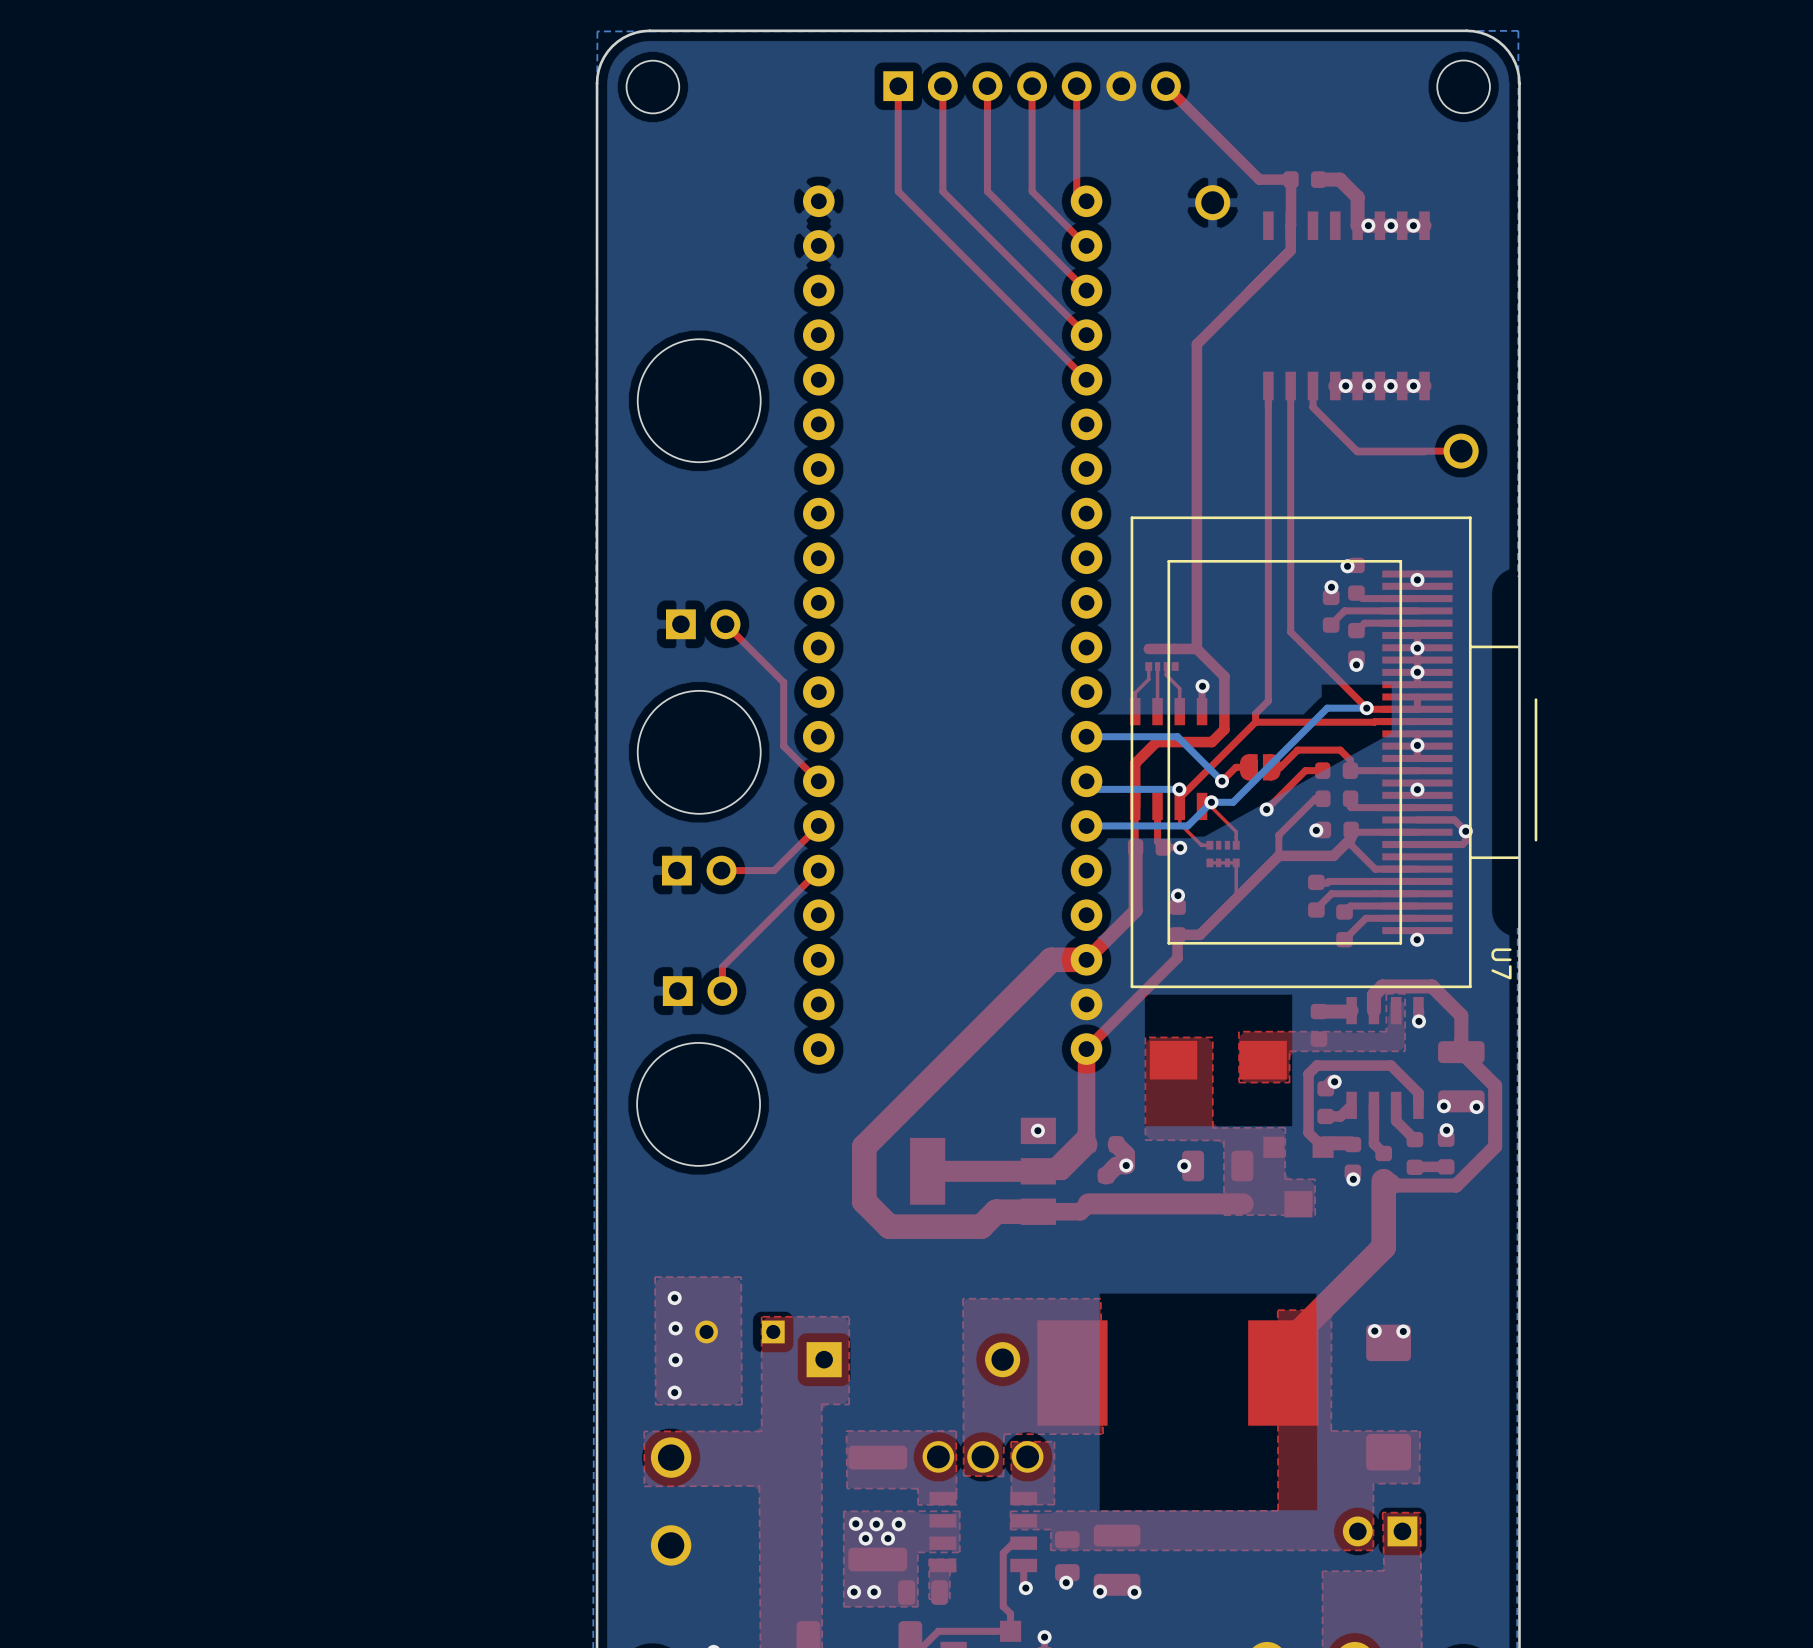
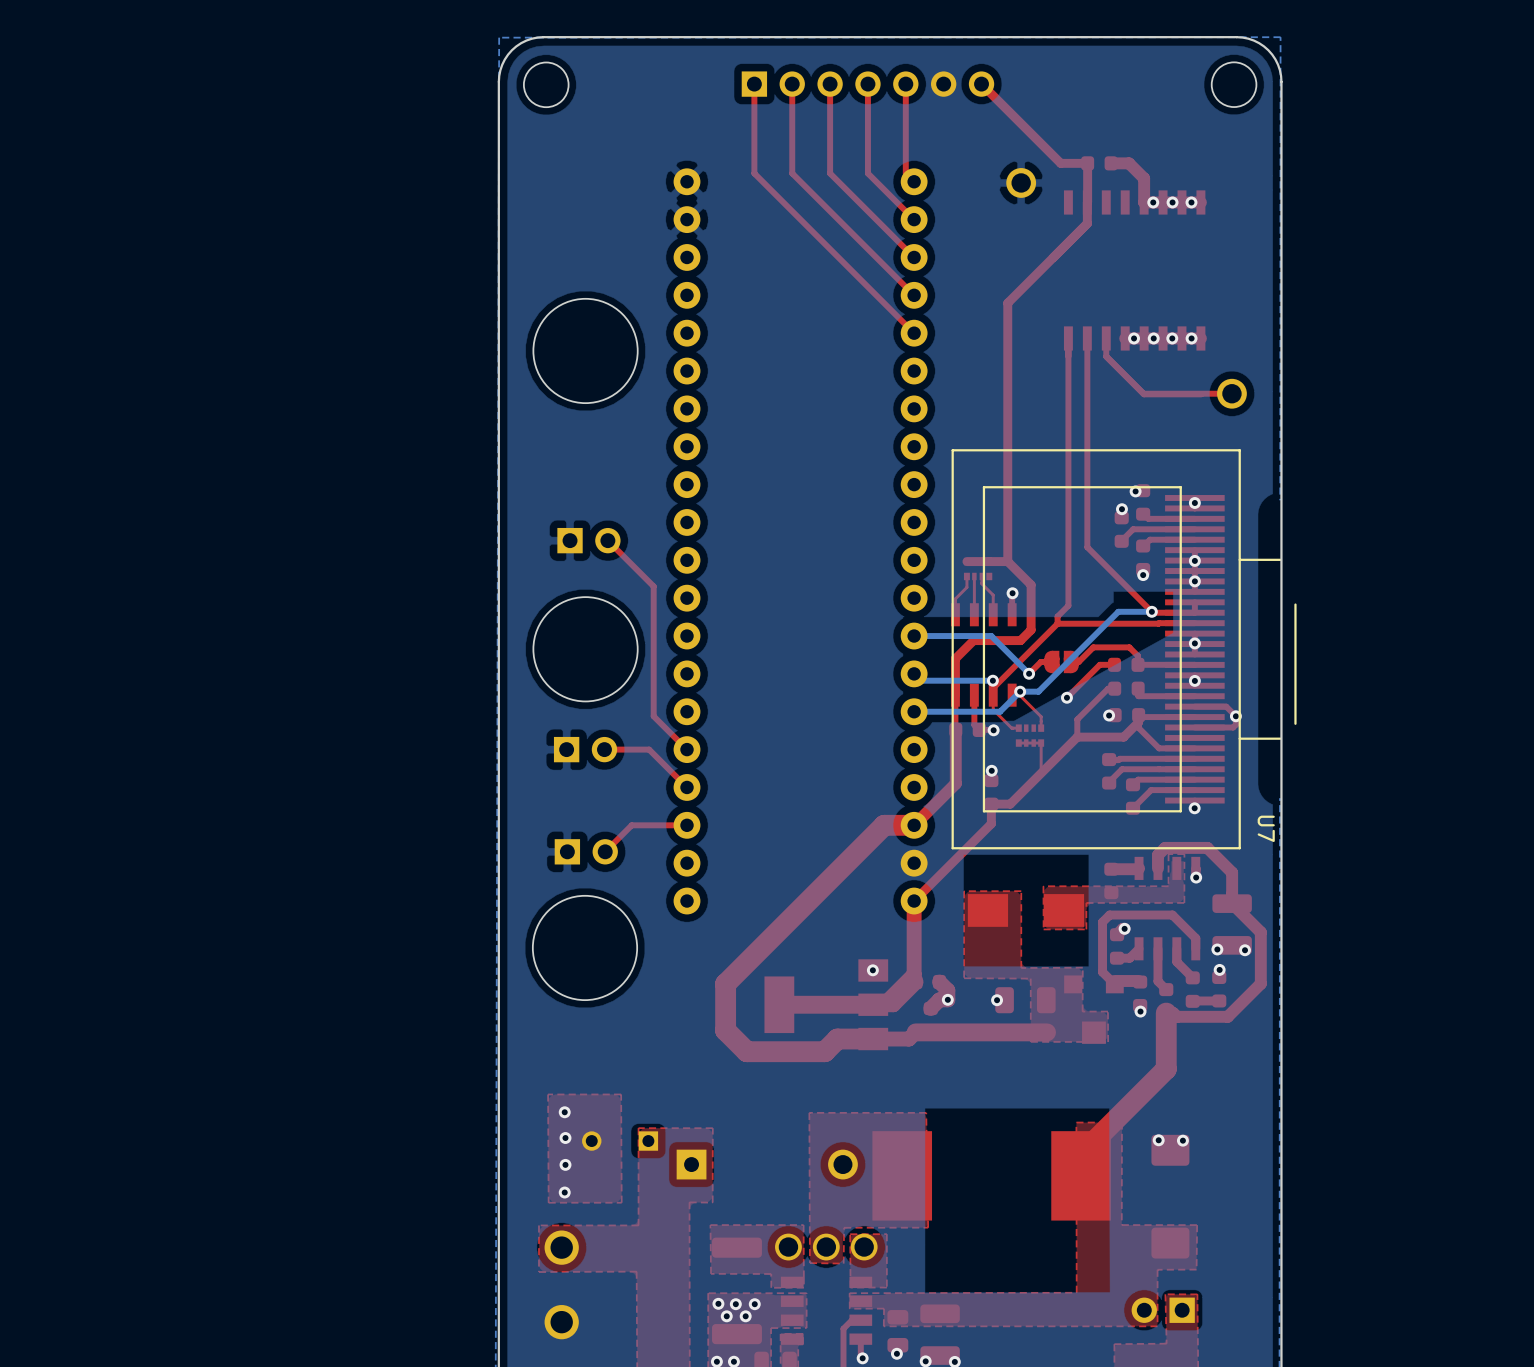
top track: (779, 678) (783, 682) (783, 746) (818, 781) -> (653, 586) (653, 716) (687, 749)
top track: (818, 825) (774, 870) -> (687, 787) (649, 749)
top track: (818, 870) (722, 966) (722, 991) -> (687, 825) (631, 825) (605, 851)

